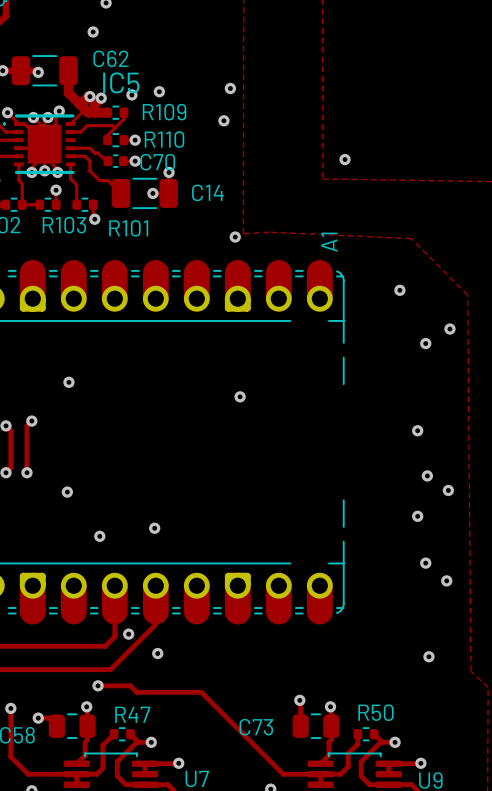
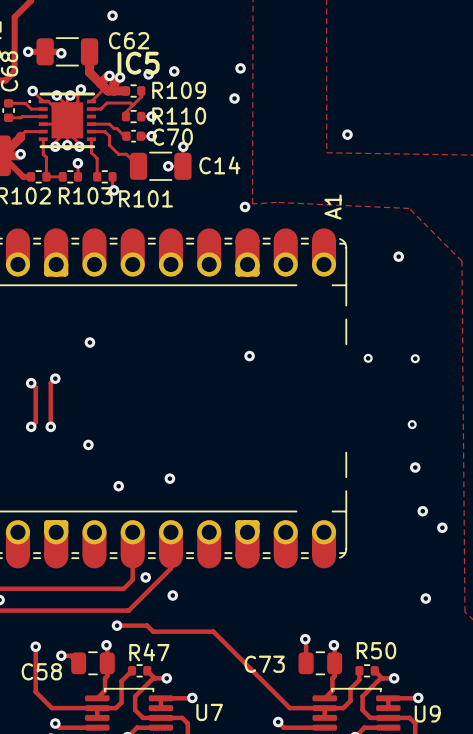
via: (449, 329) -> none
via: (425, 343) -> none
via: none -> (368, 358)
via: none -> (415, 358)
via: (417, 430) -> none
via: none -> (412, 424)
via: (427, 475) -> none
via: (448, 490) -> none

